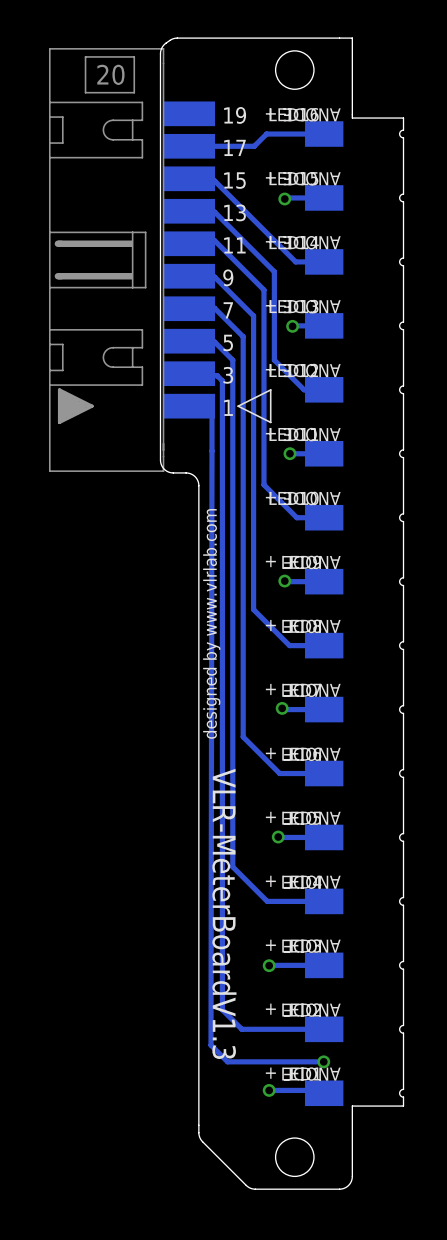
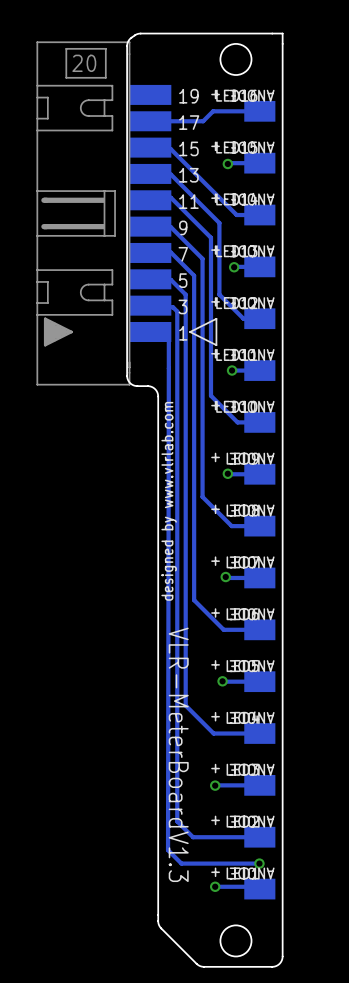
board edge: (352, 118) (403, 118) (403, 130) (399, 134) (403, 137) (403, 194) (399, 197) (403, 201) (403, 258) (399, 261) (403, 265) (403, 322) (399, 325) (403, 329) (403, 385) (399, 389) (403, 393) (403, 449) (399, 453) (403, 457) (403, 513) (399, 517) (403, 521) (403, 577) (399, 581) (403, 585) (403, 641) (399, 645) (403, 649) (403, 705) (399, 709) (403, 713) (403, 769) (399, 773) (403, 777) (403, 833) (399, 837) (403, 841) (403, 897) (399, 901) (403, 905) (403, 961) (399, 965) (403, 969) (403, 1025) (399, 1029) (403, 1033) (403, 1089) (399, 1093) (403, 1097) (403, 1106) (352, 1106) -> (282, 98) (282, 899)

